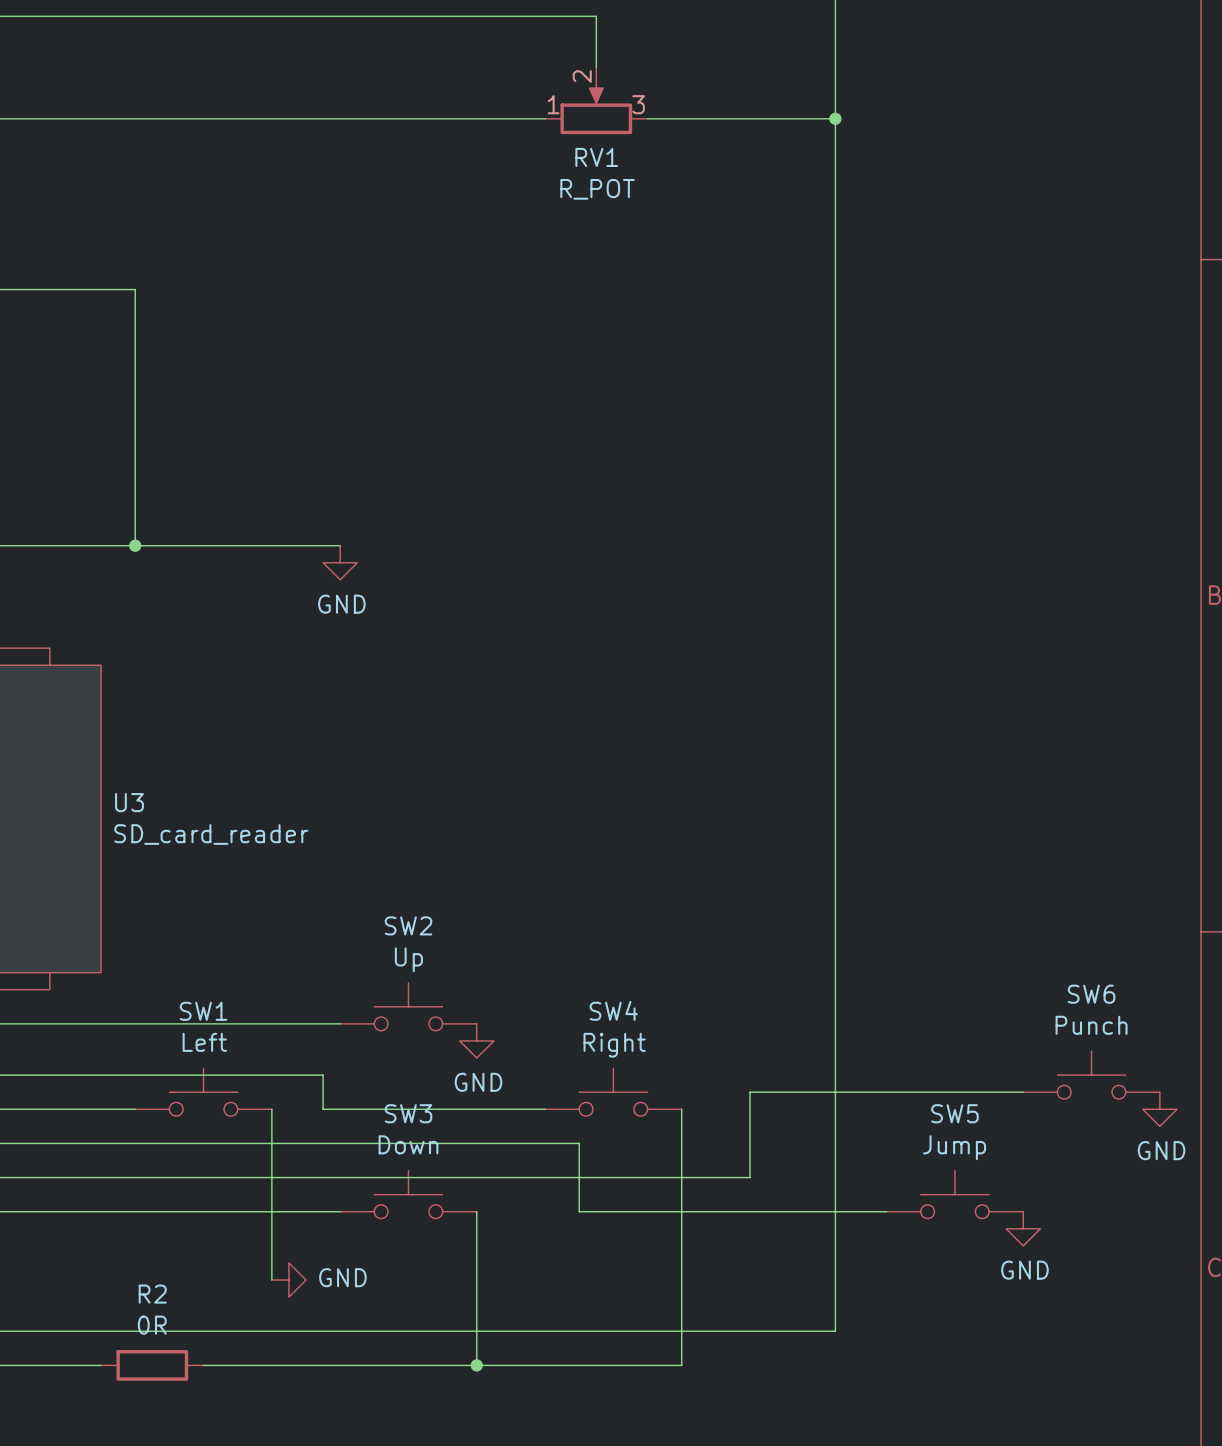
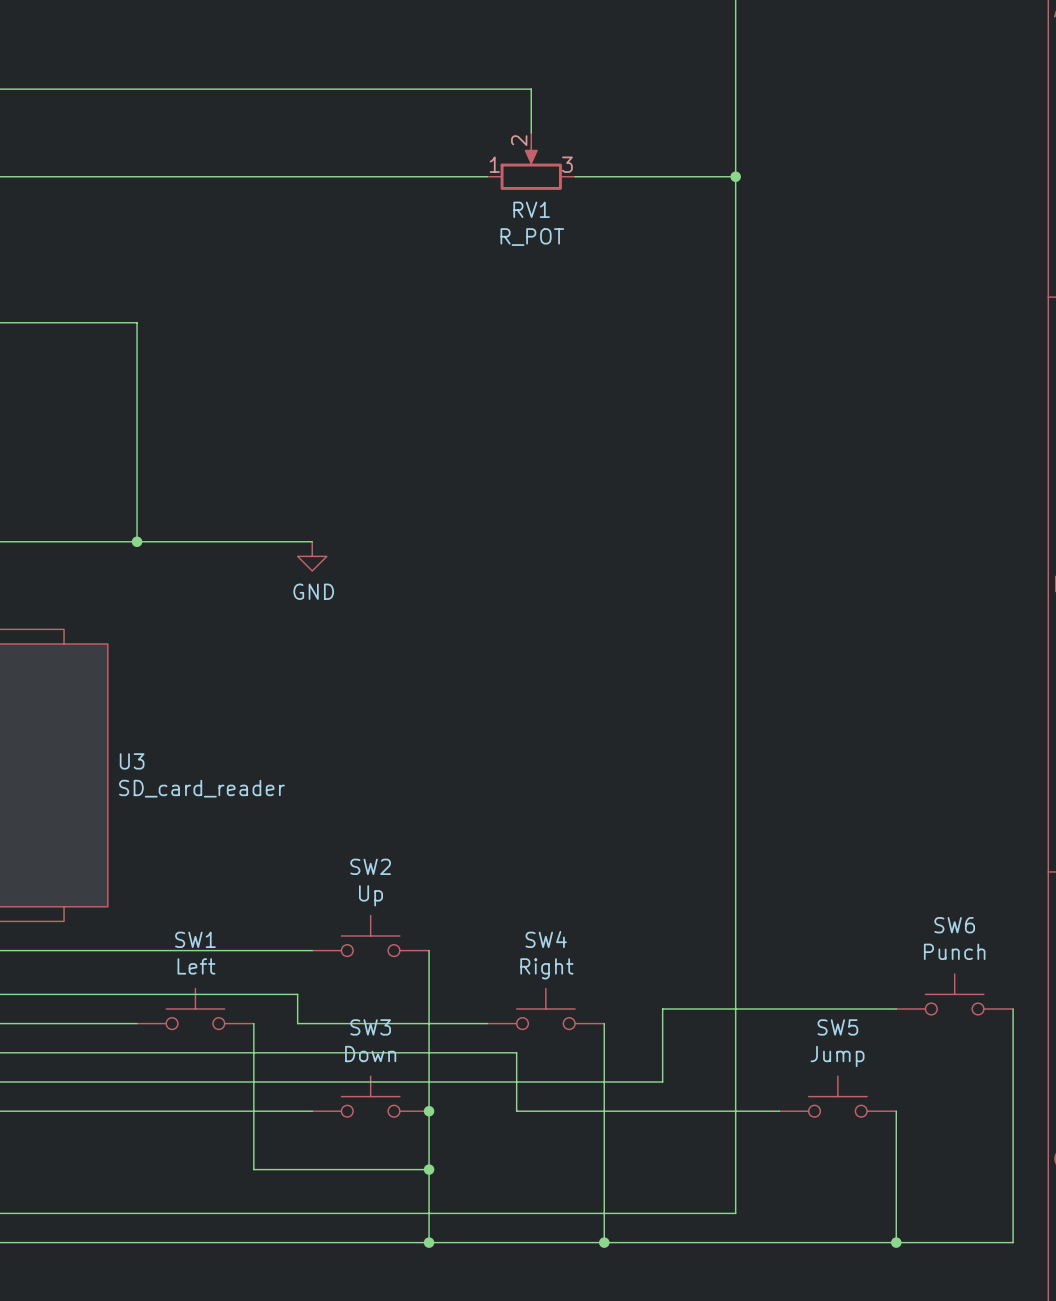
wire: none -> (429, 950) (429, 1111)
power symbol: GND (476, 1040) -> none
wire: none -> (1013, 1009) (1013, 1242) (604, 1242)
power symbol: GND (1159, 1109) -> none
junction: none -> (429, 1111)
wire: none -> (896, 1111) (896, 1242)
power symbol: GND (1023, 1228) -> none
wire: none -> (253, 1169) (429, 1169)
power symbol: GND (288, 1280) -> none
junction: none -> (429, 1169)
wire: none -> (107, 1242) (195, 1242)
R2: 0R (152, 1365) -> none
junction: none -> (604, 1242)
junction: none -> (896, 1242)

